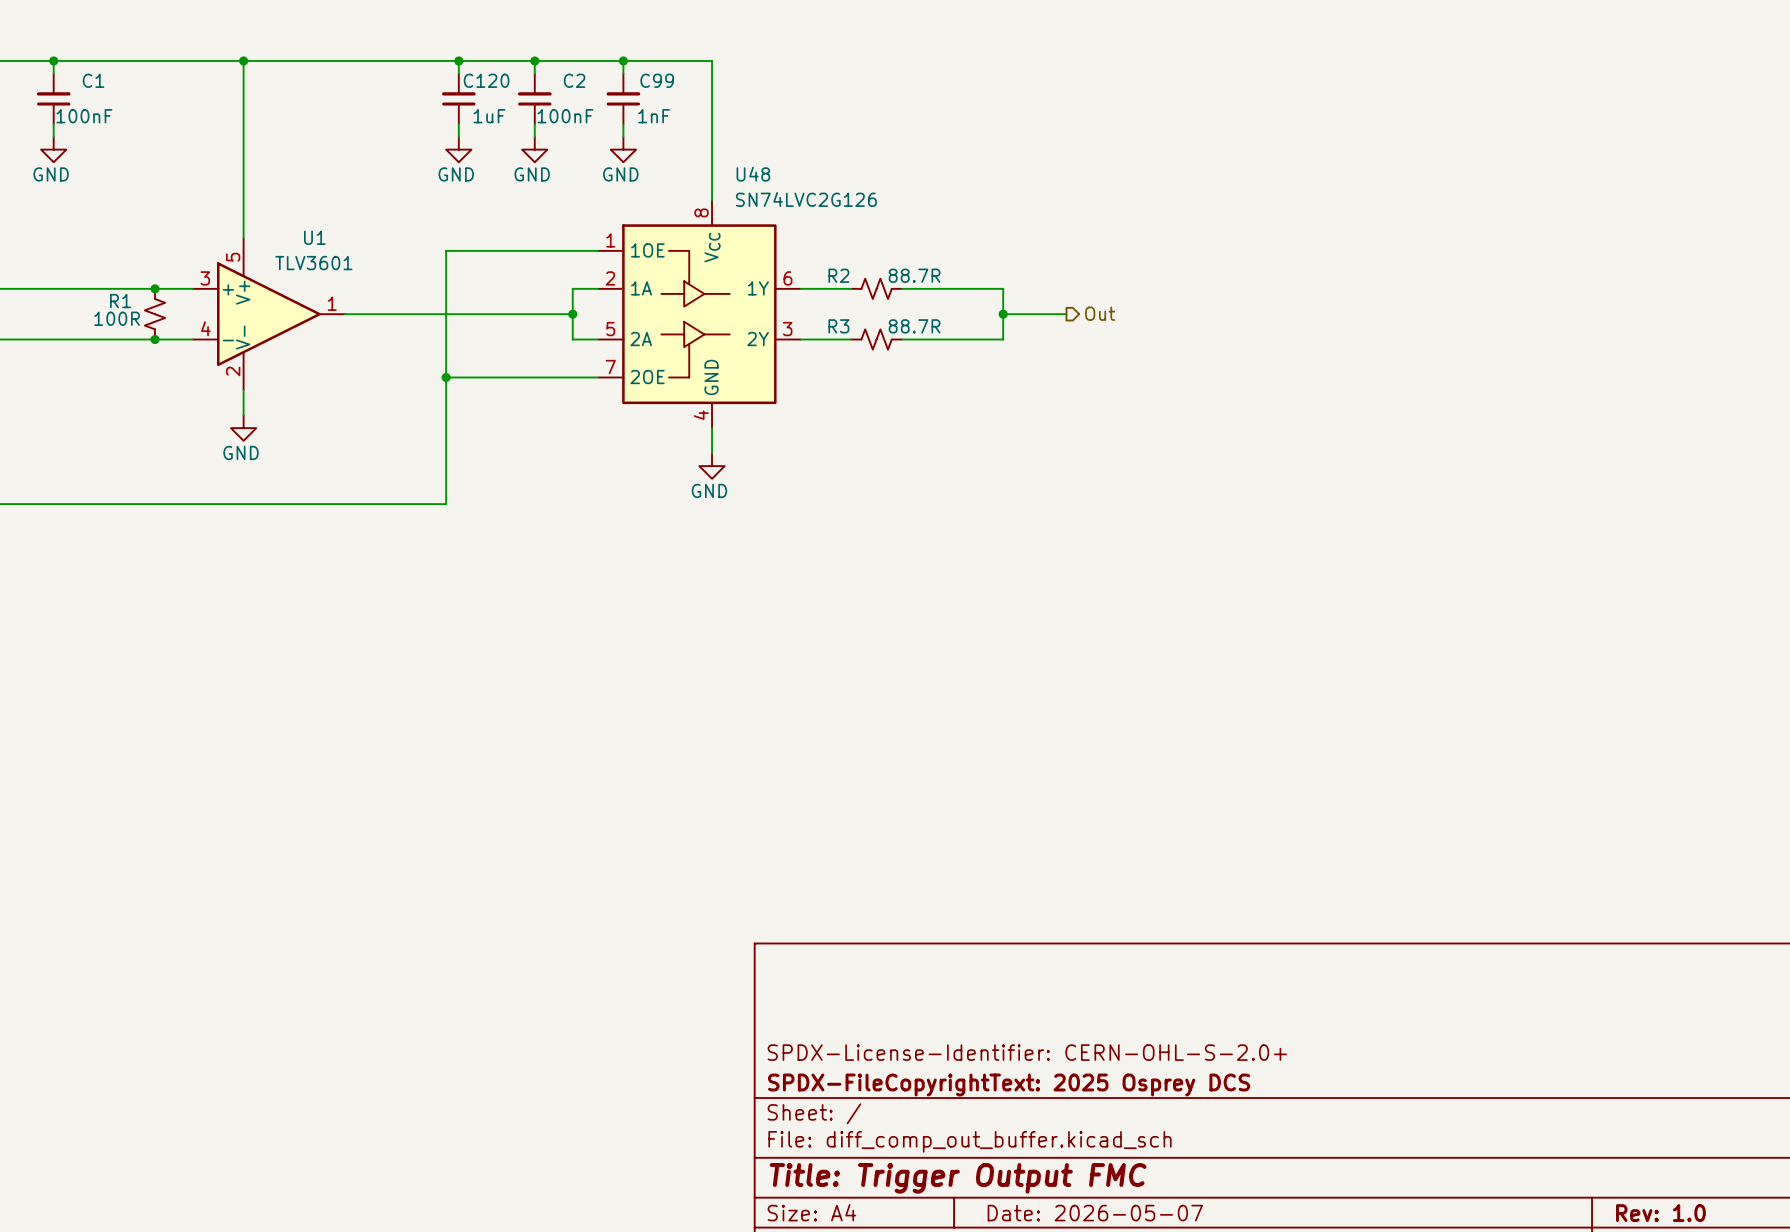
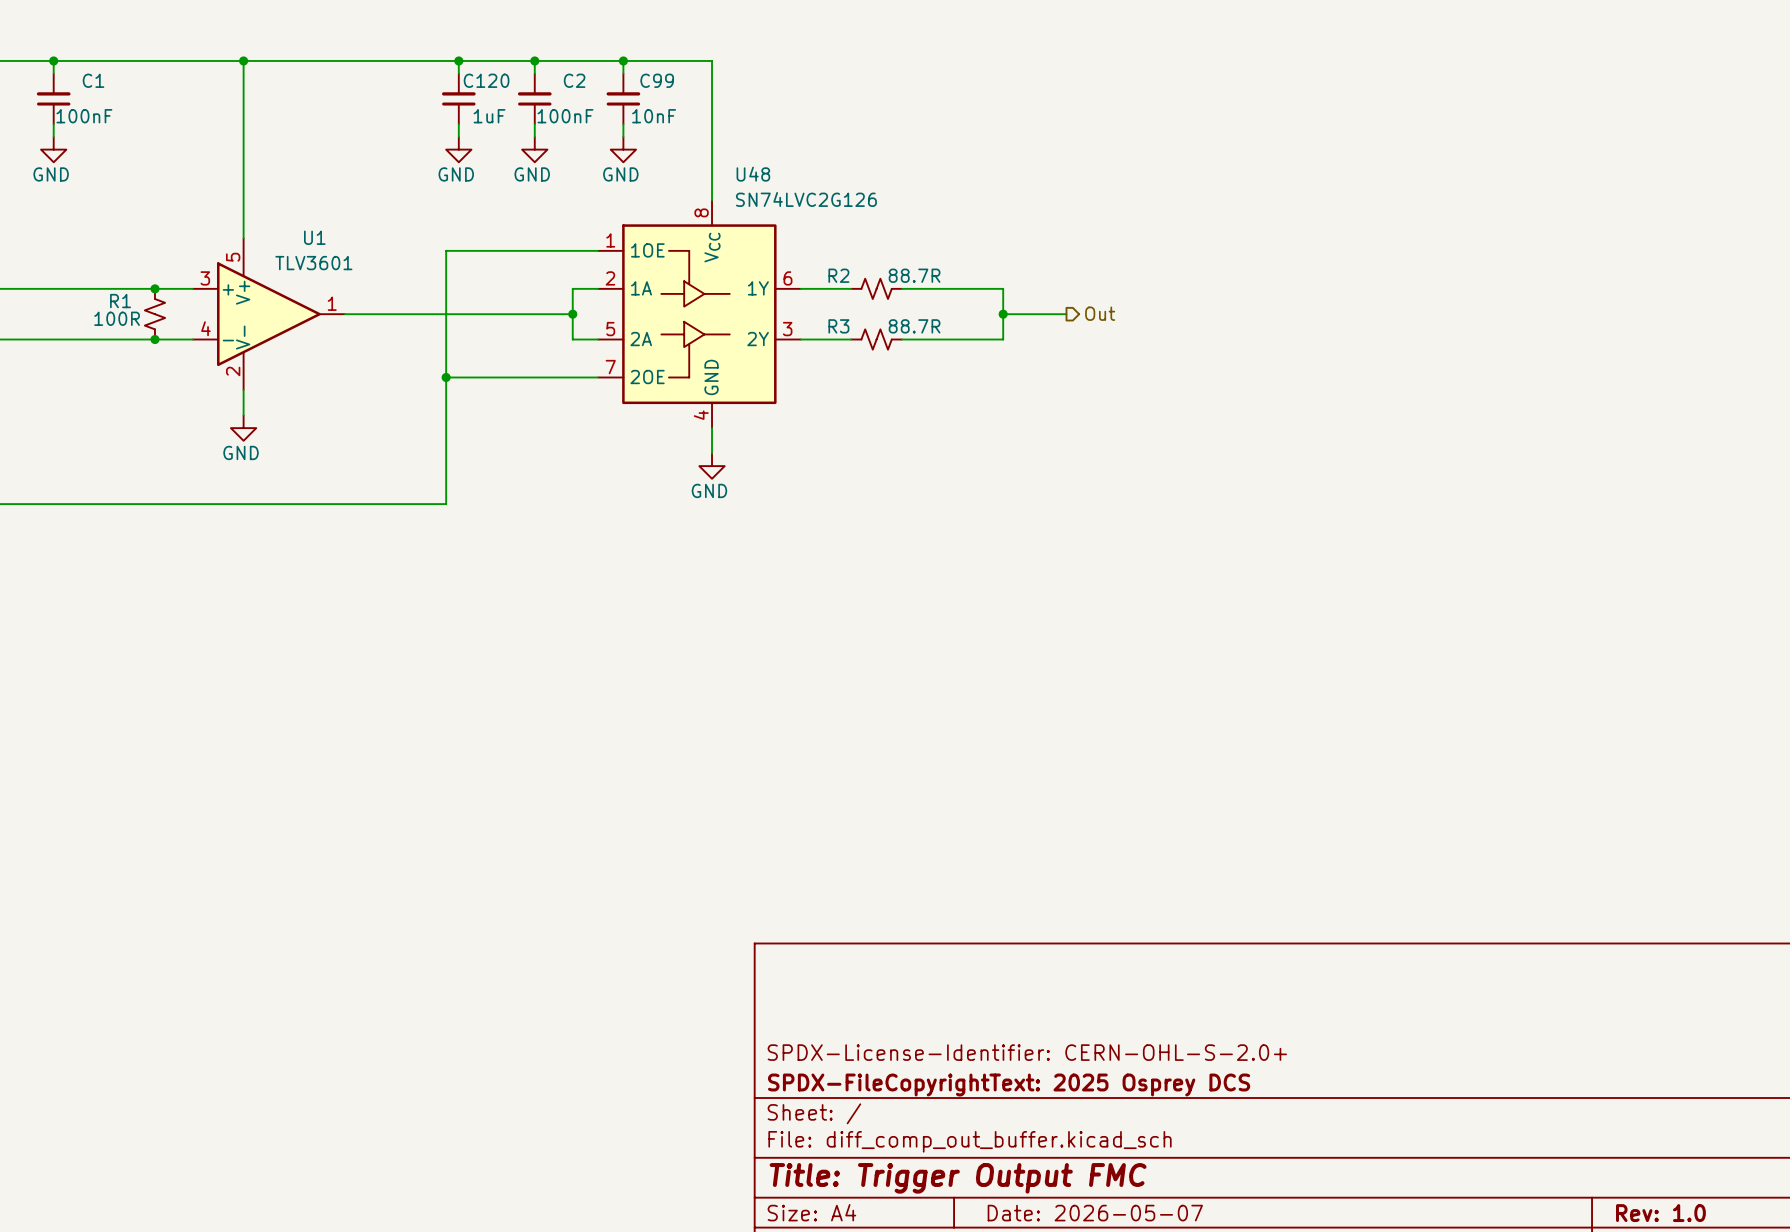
C99 value: 1nF (654, 116) -> 10nF (654, 116)

